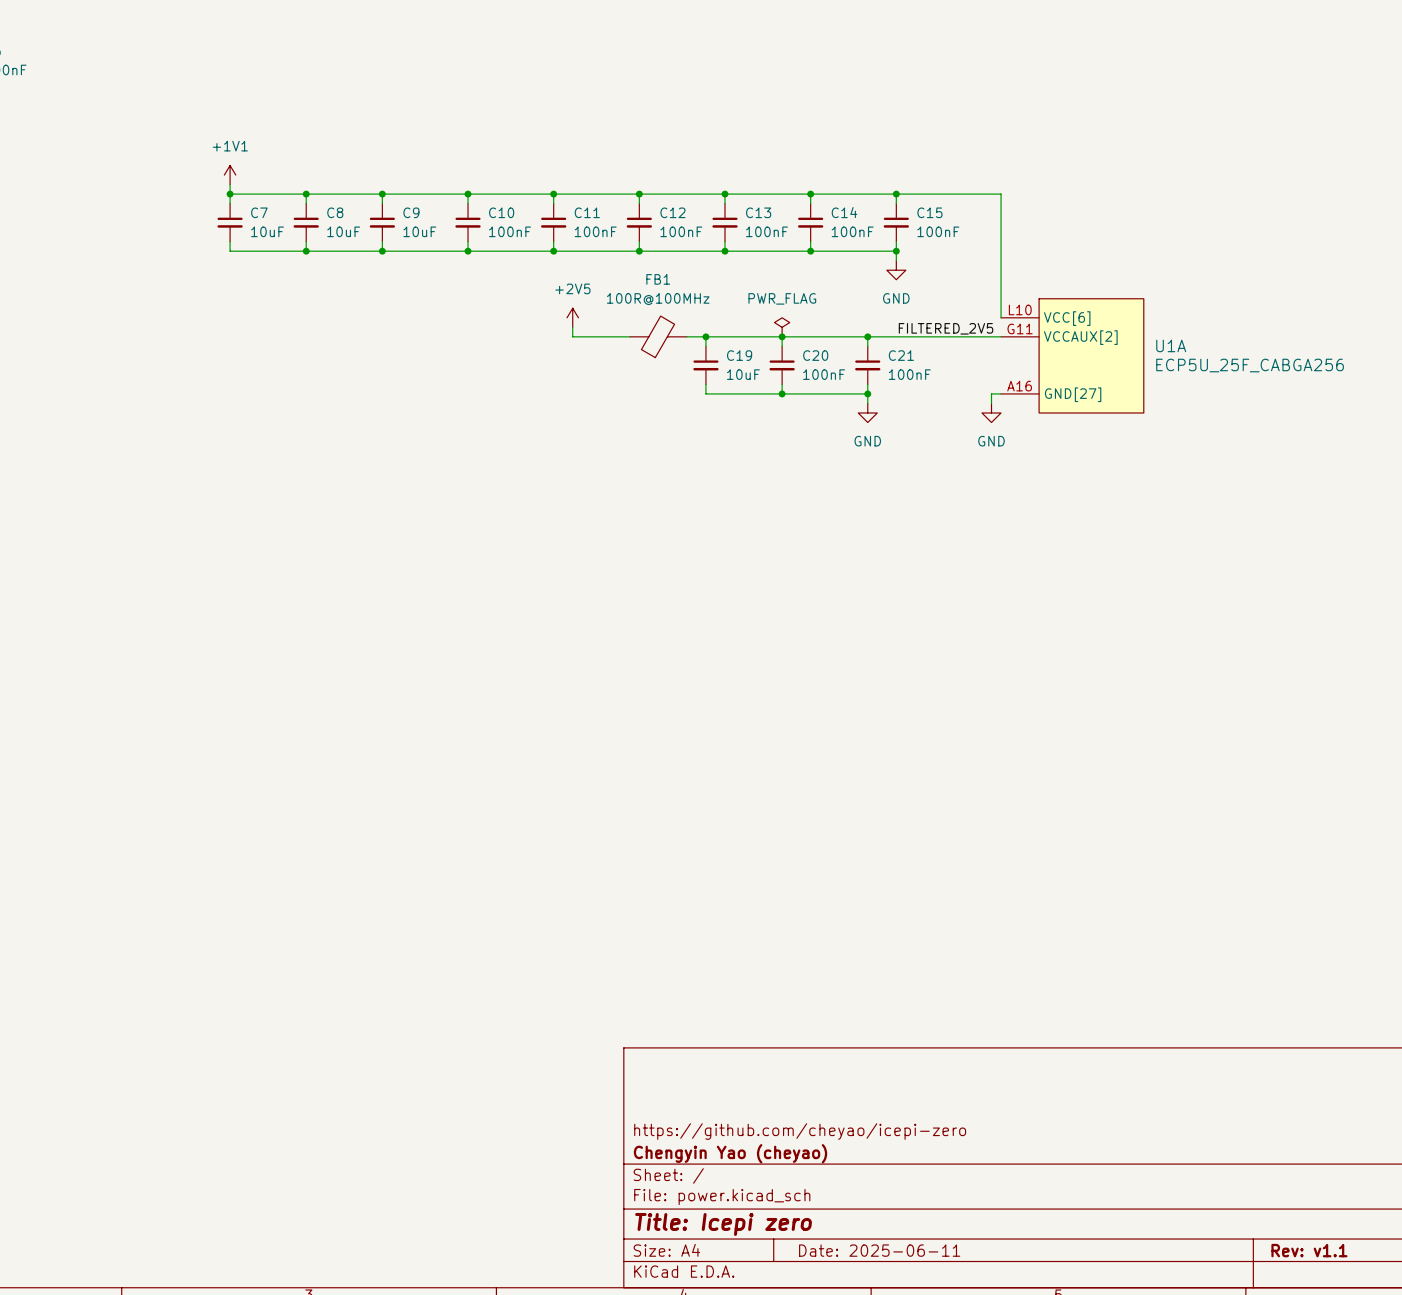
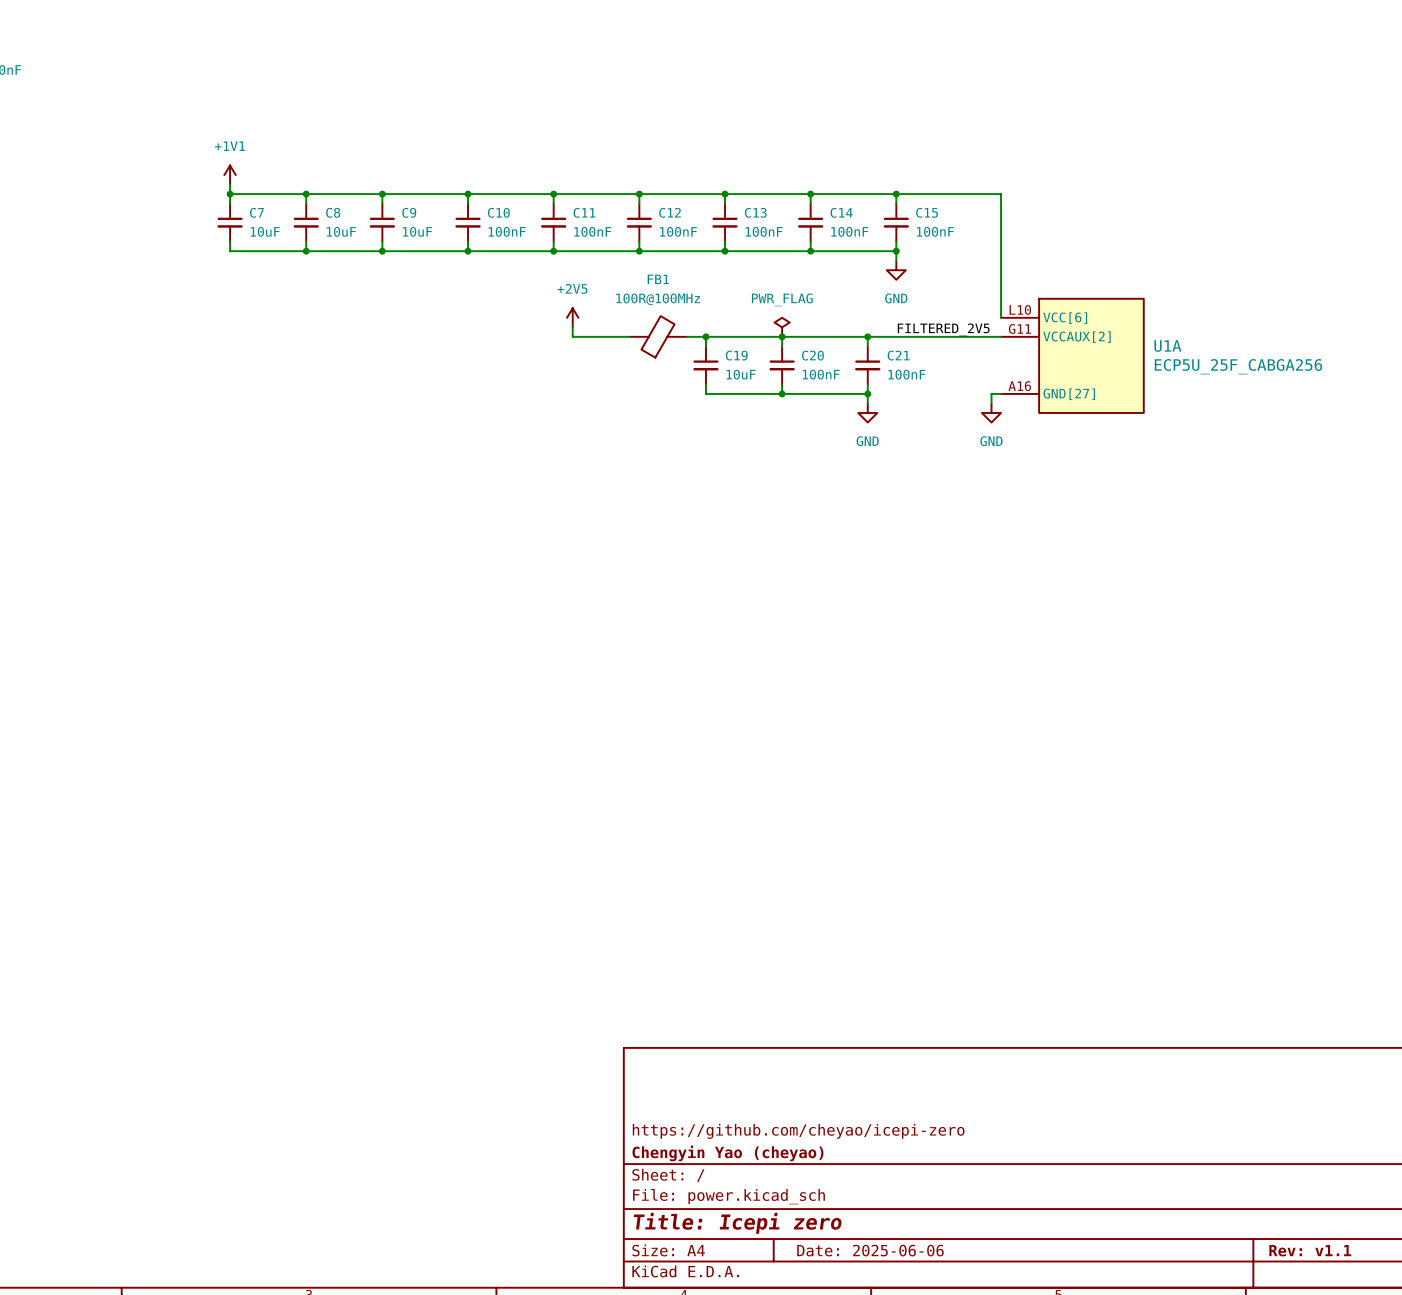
title block: Date: 2025-06-11 (879, 1250) -> Date: 2025-06-06 (870, 1250)

